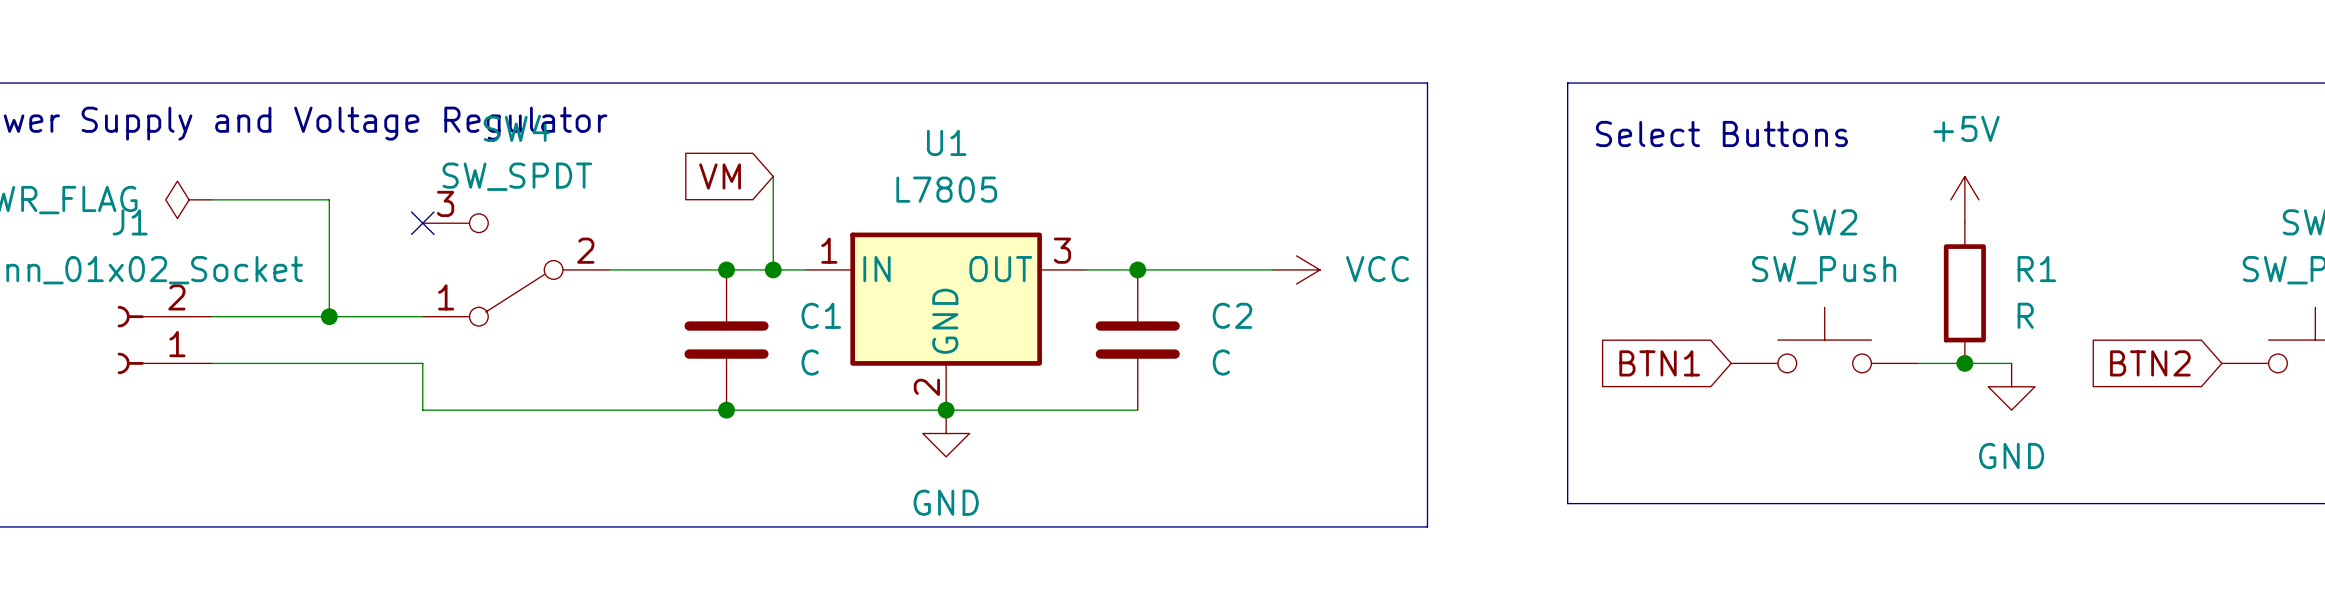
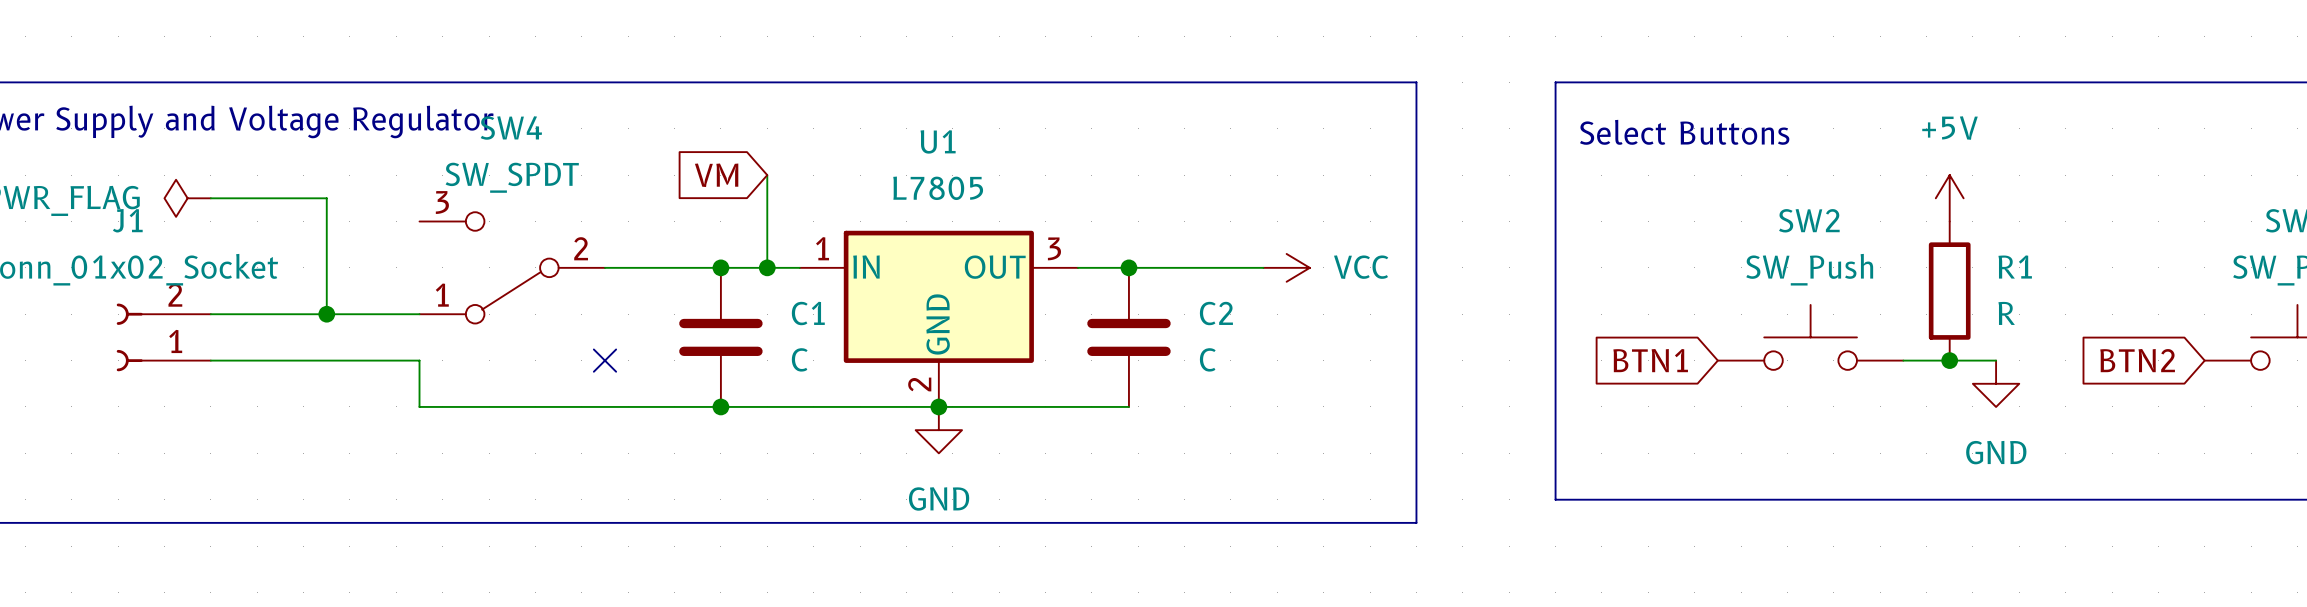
no-connect mark: (422, 223) -> none
no-connect mark: none -> (604, 360)

